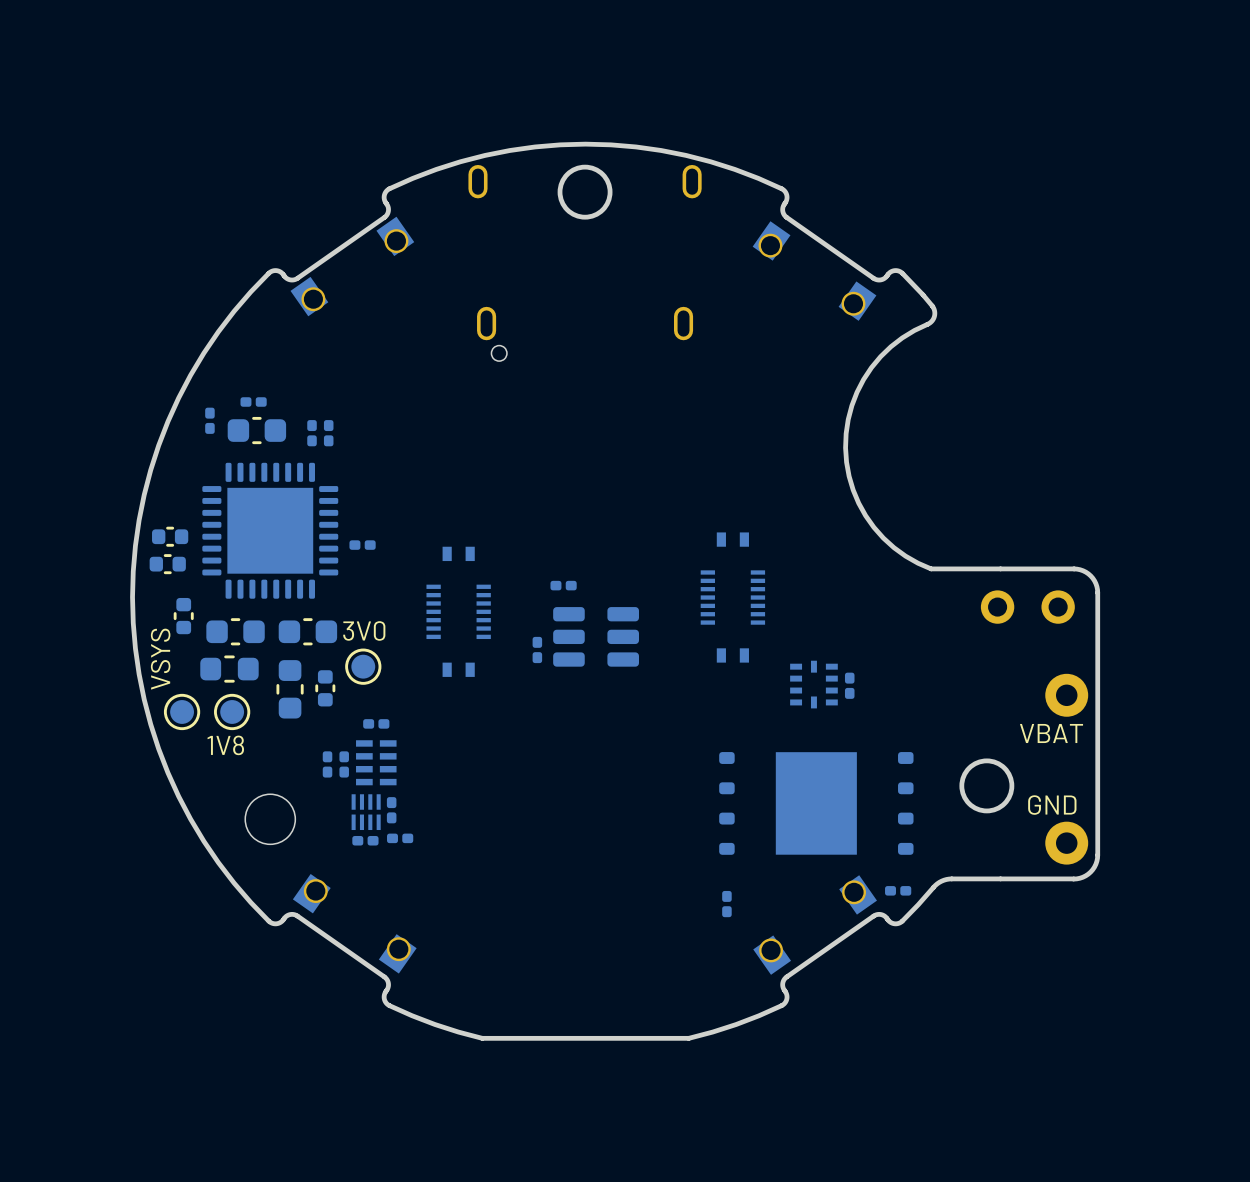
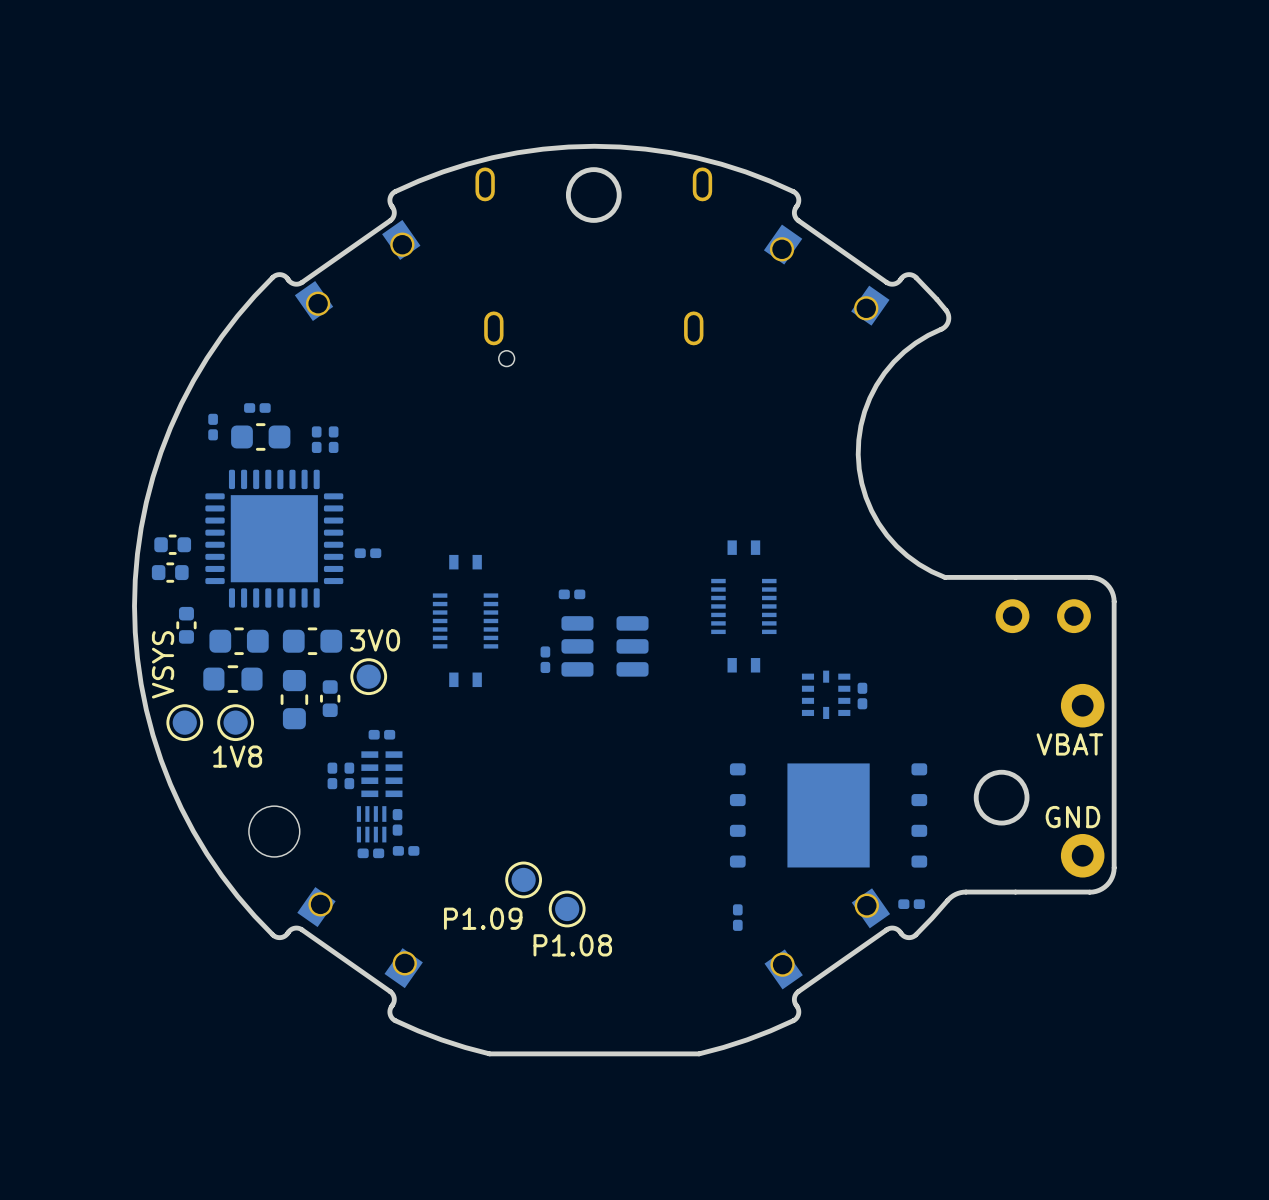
part: none -> (523, 879)
part: none -> (567, 908)
text: none -> P1.09 (483, 918)
text: none -> P1.08 (572, 945)

